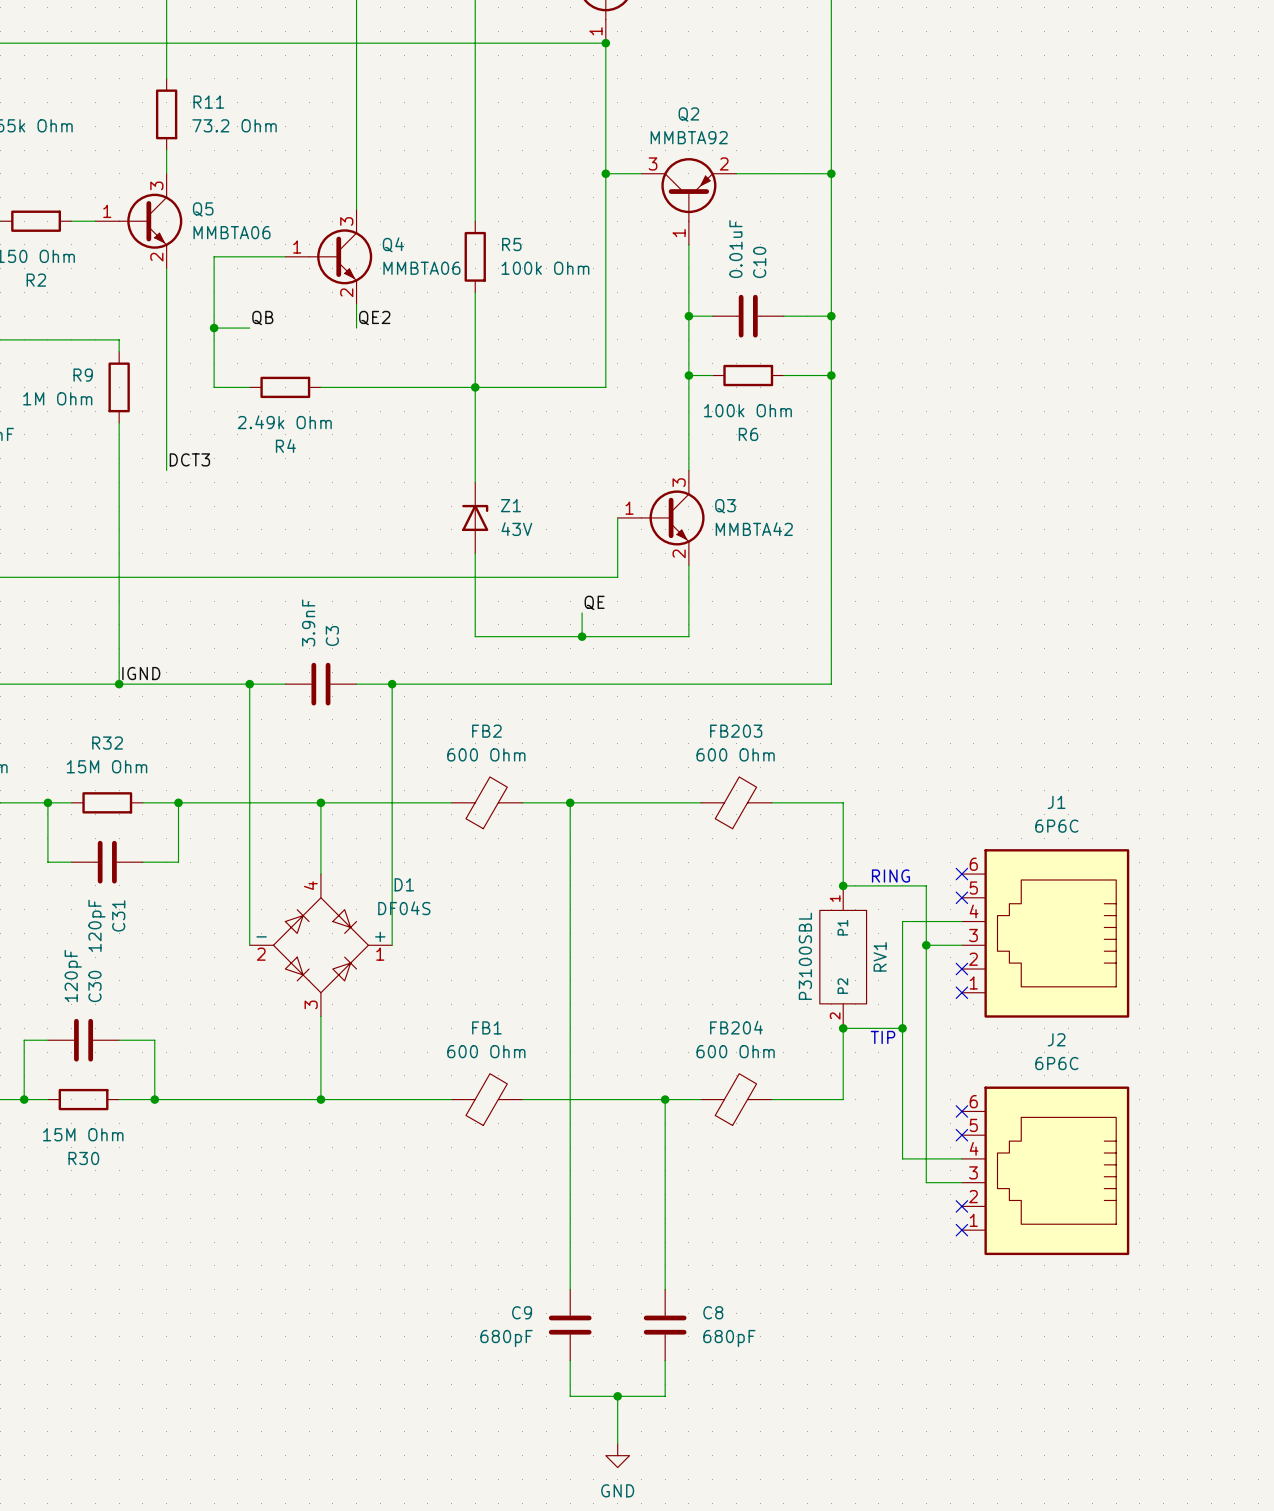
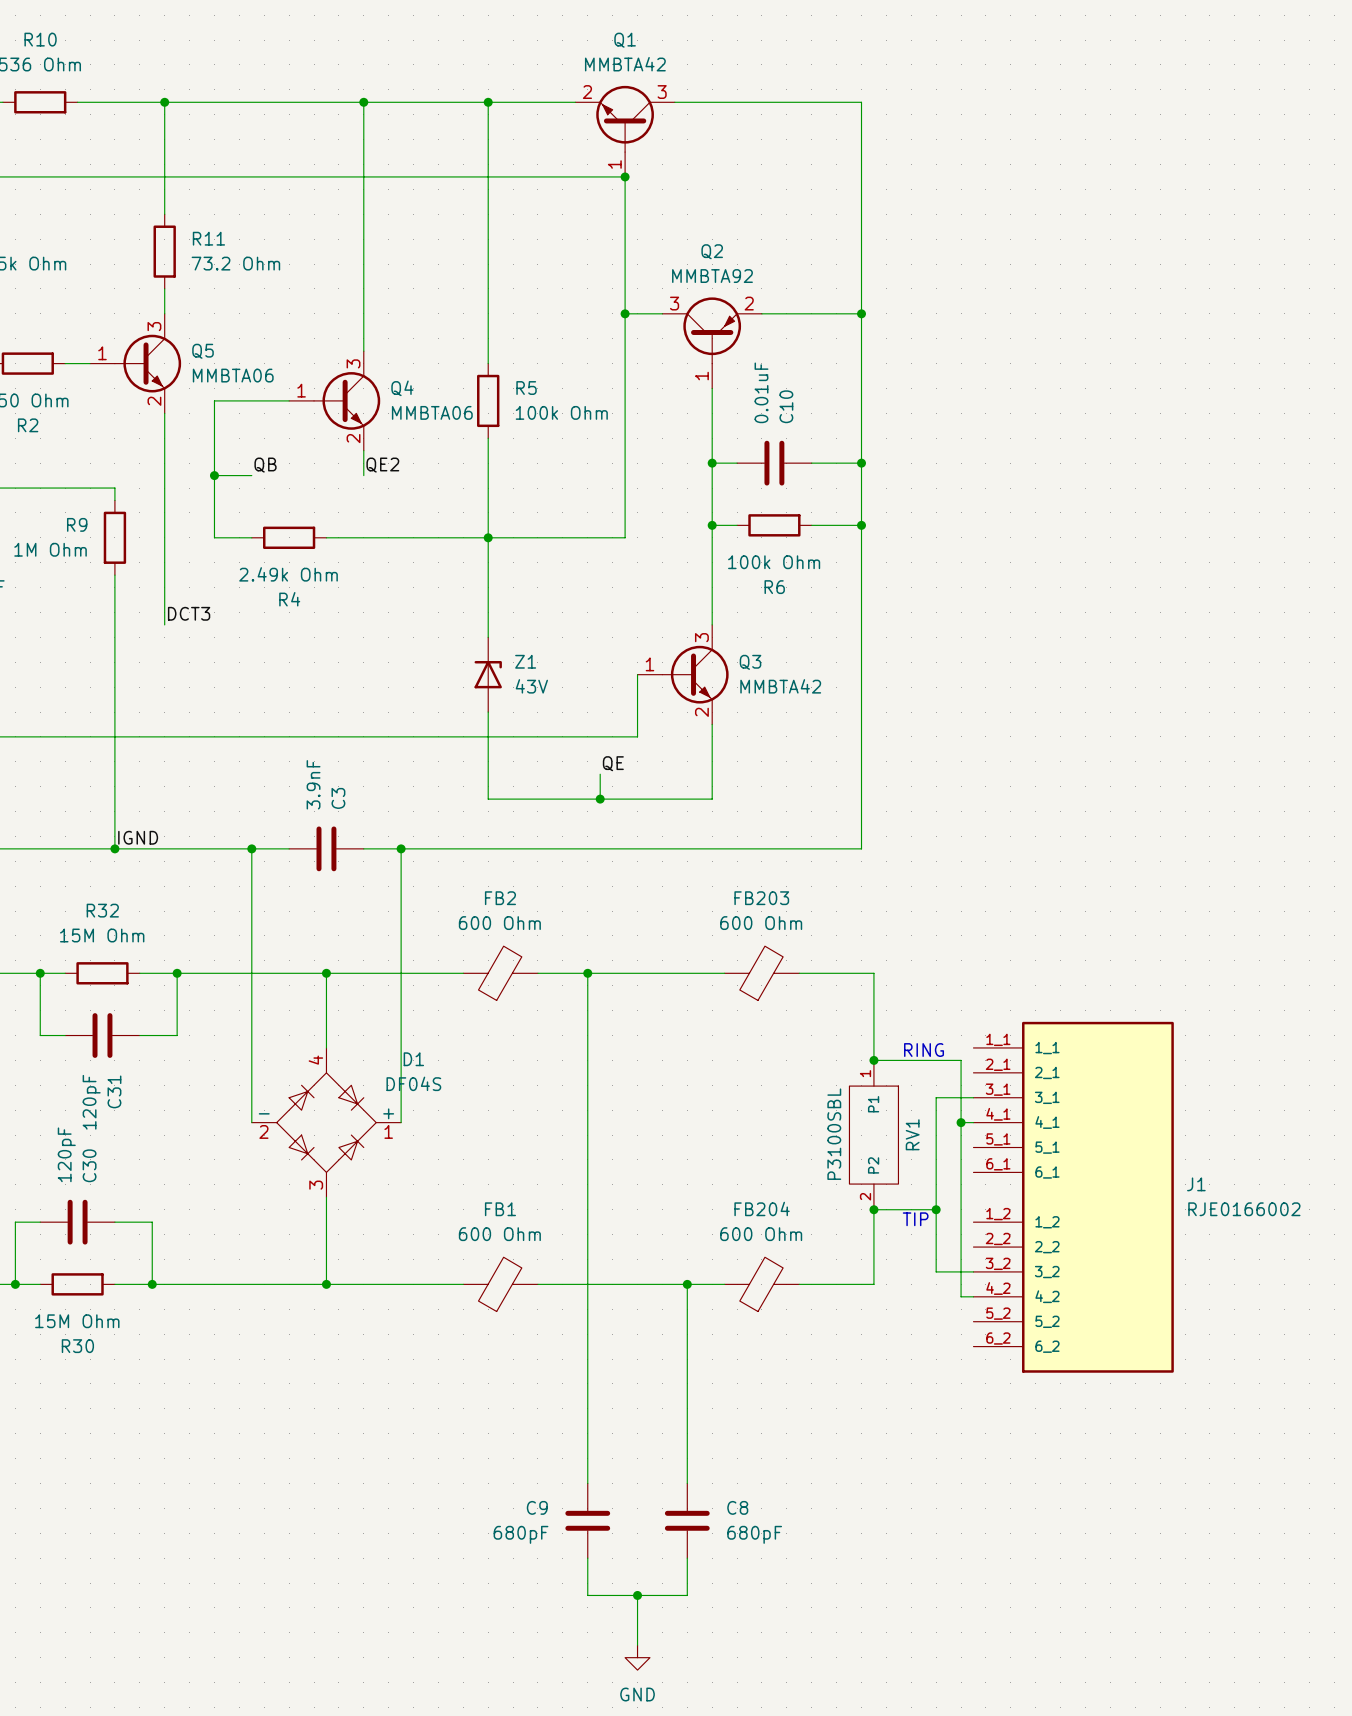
J1 name position: J1 (1056, 802) -> J1 (1196, 1184)
J1 value: 6P6C (1056, 826) -> RJE0166002 (1244, 1209)
J1 symbol: [961, 849, 1130, 1018] -> [973, 1021, 1174, 1373]
no-connect mark: (961, 874) -> none
no-connect mark: (961, 897) -> none
no-connect mark: (961, 969) -> none
no-connect mark: (961, 992) -> none
wire: (902, 1087) (902, 1158) (961, 1158) -> (936, 1271) (973, 1271)
wire: (926, 1111) (926, 1182) (961, 1182) -> (961, 1296) (973, 1296)
no-connect mark: (961, 1111) -> none
no-connect mark: (961, 1135) -> none
J2: 6P6C (1045, 1170) -> none
no-connect mark: (961, 1206) -> none
no-connect mark: (961, 1230) -> none

